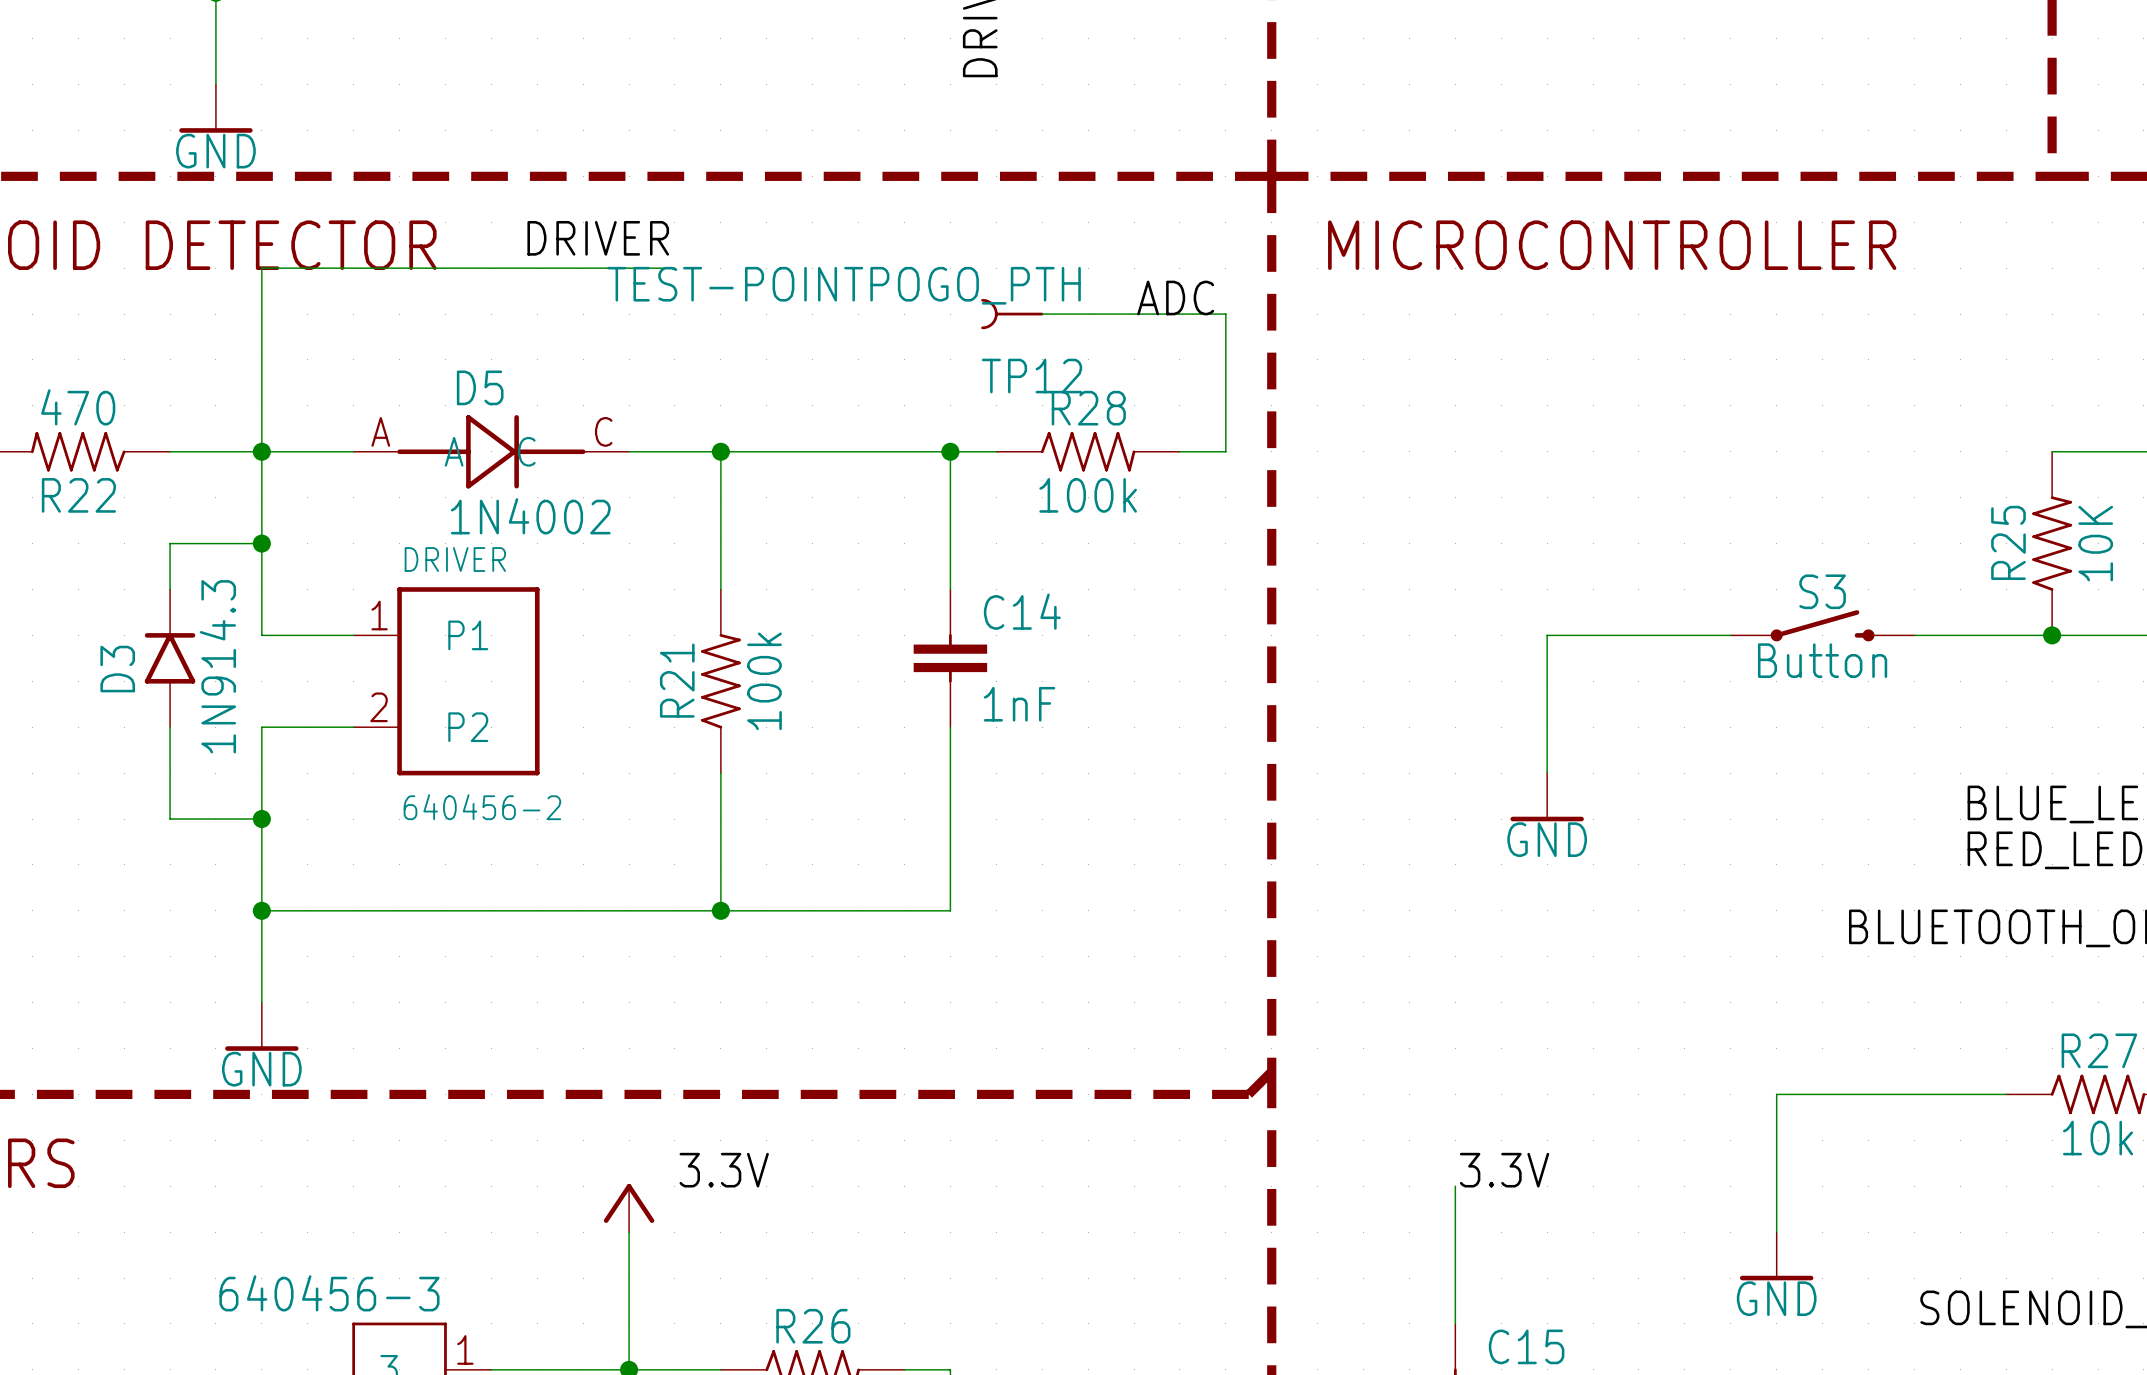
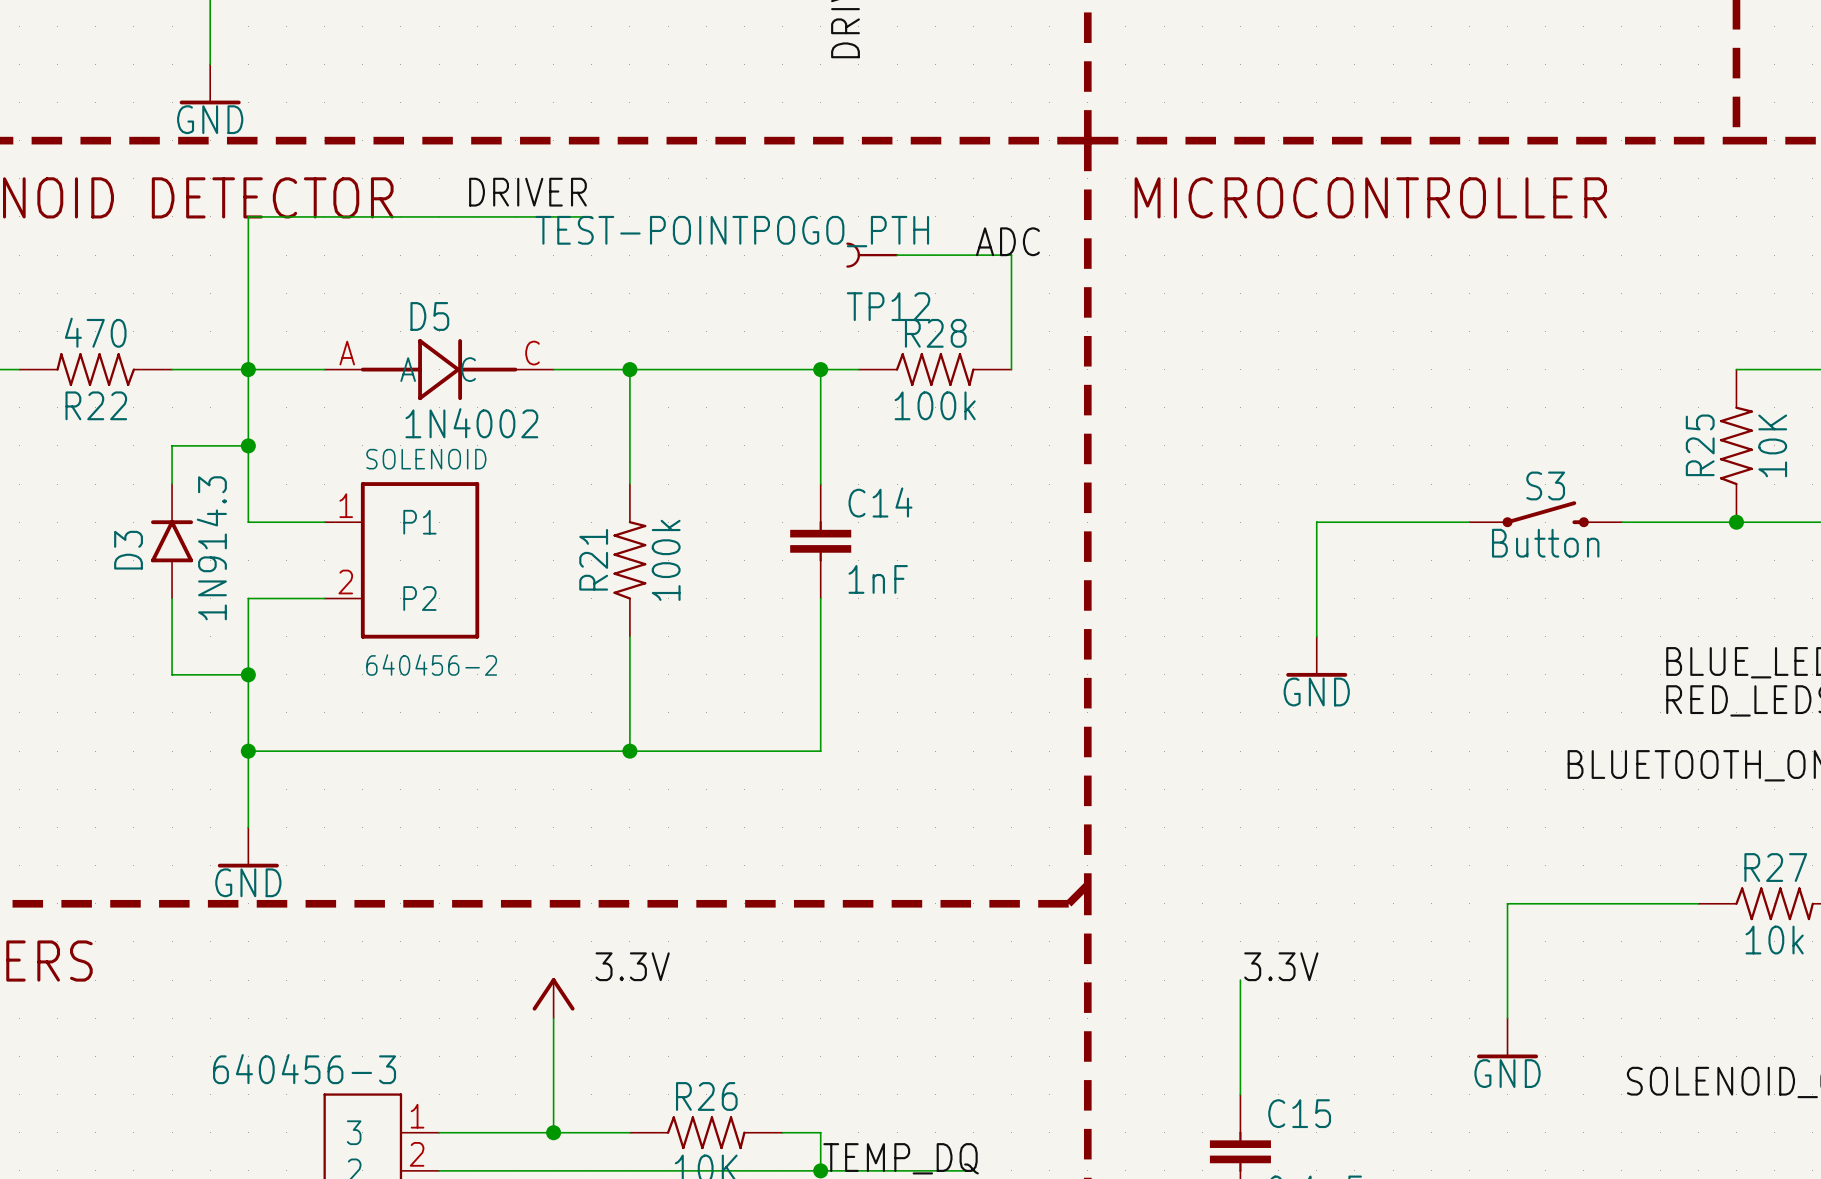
wire: (1179, 314) (1225, 314) (1225, 451) (1179, 451) -> (1011, 255) (1011, 369)
DRIVER name: DRIVER (455, 559) -> SOLENOID (426, 459)

